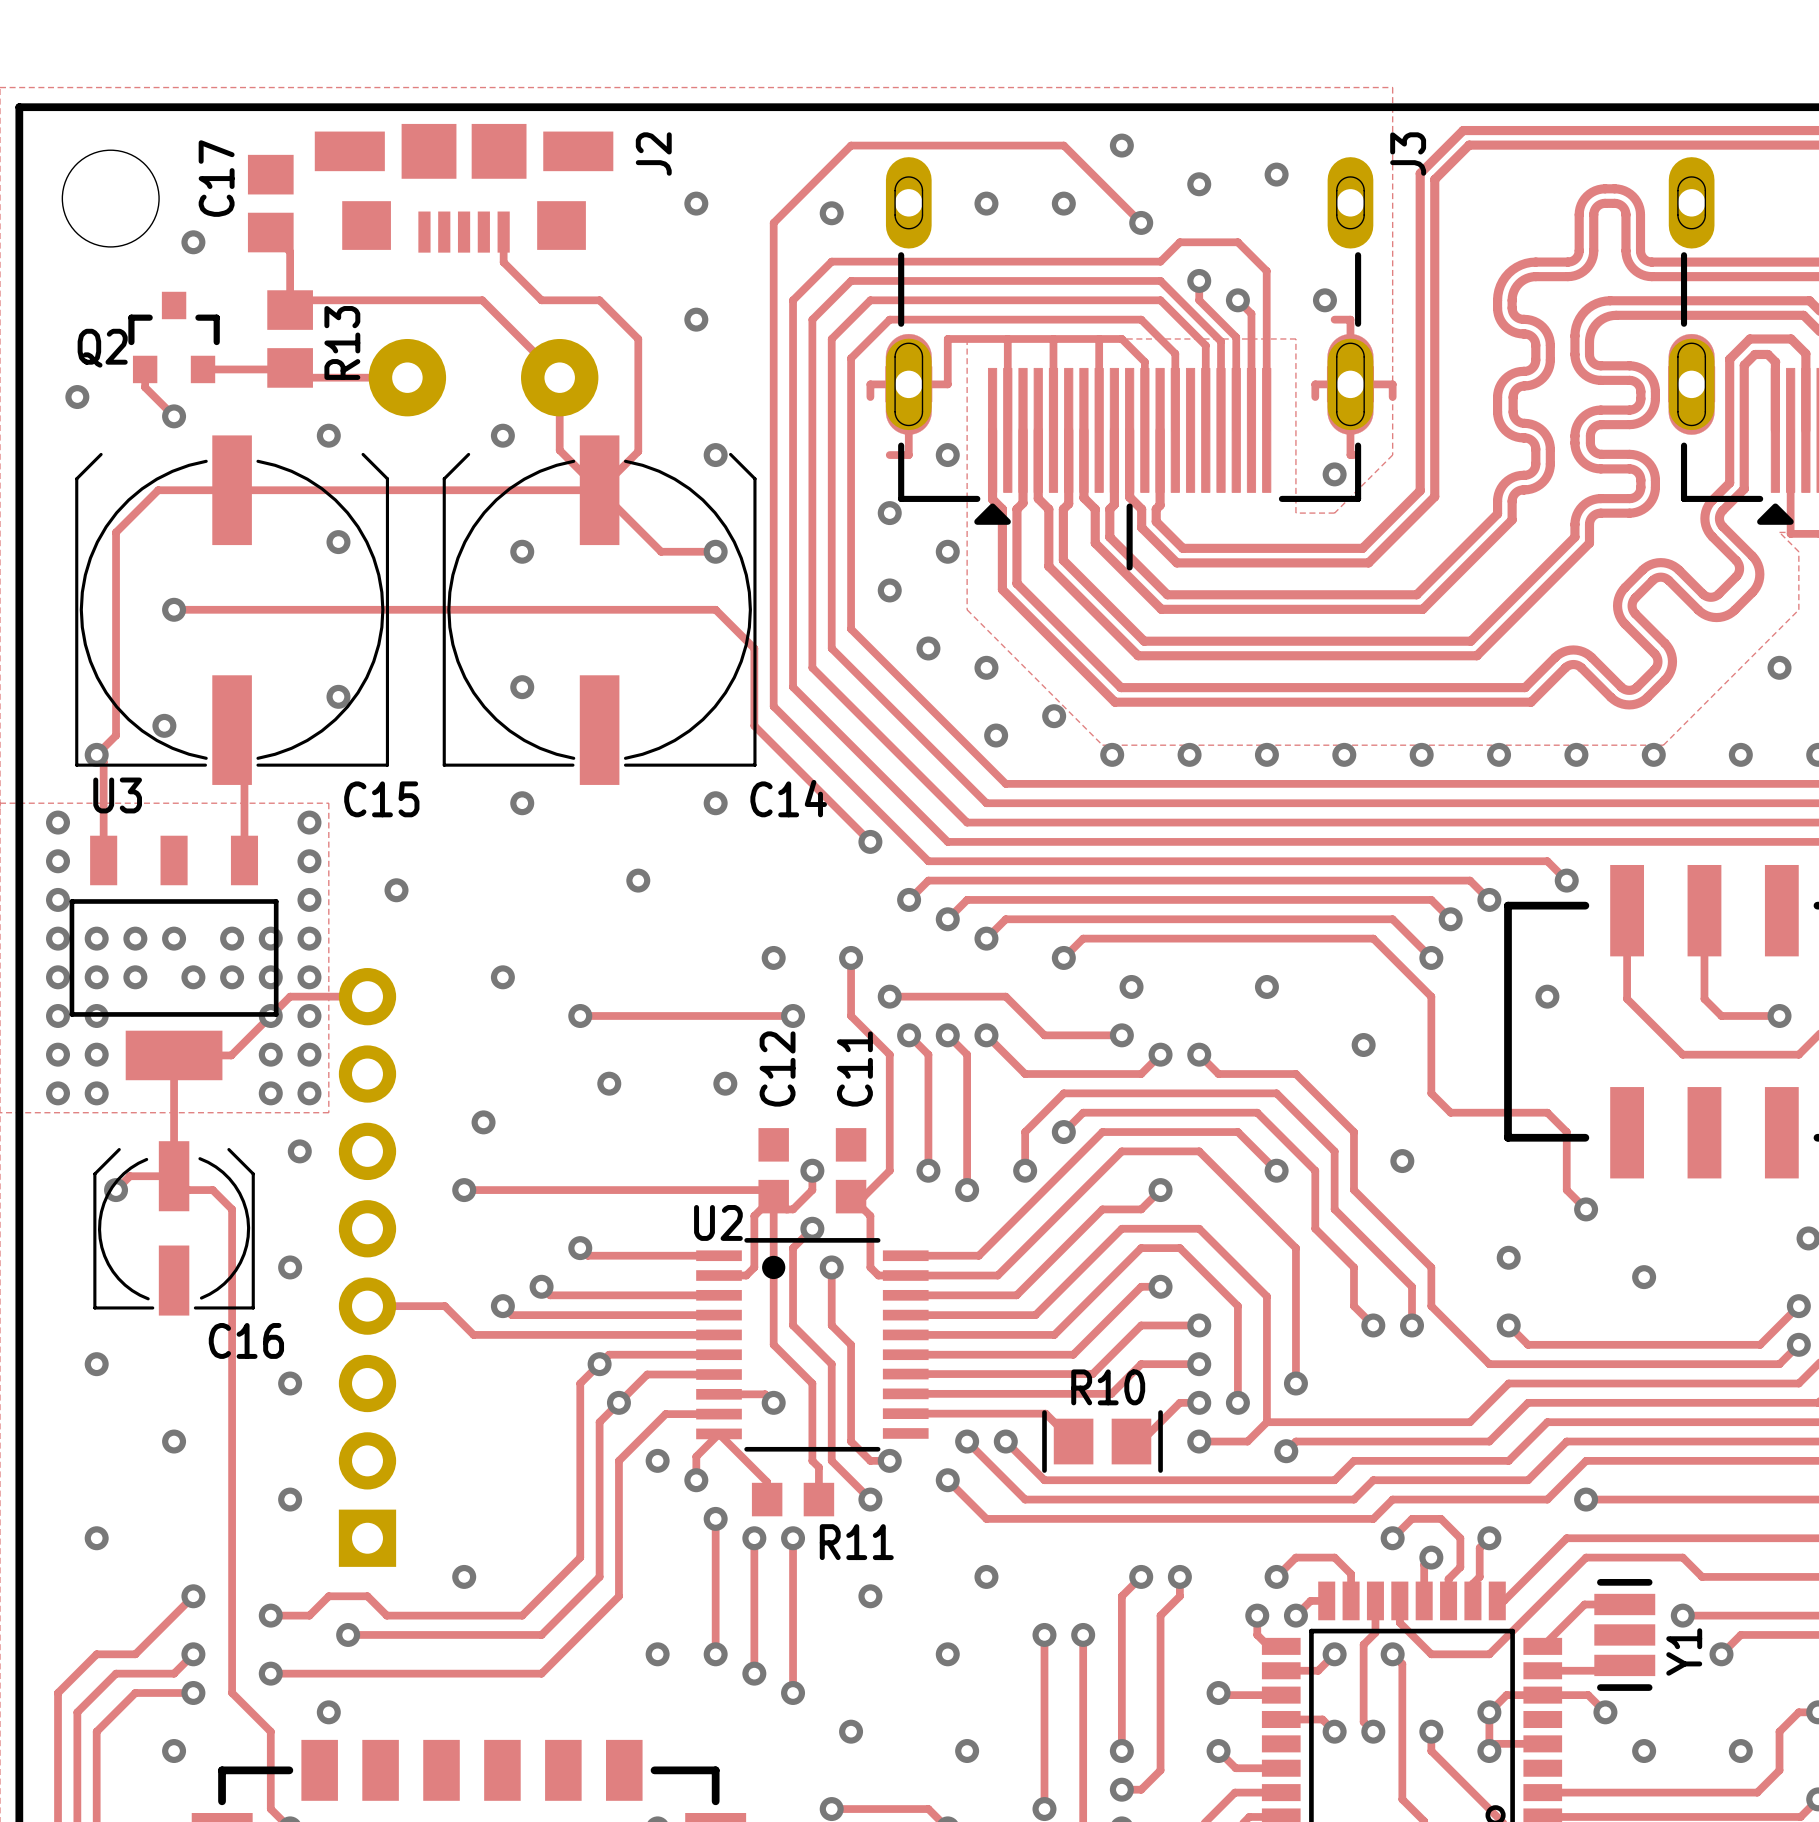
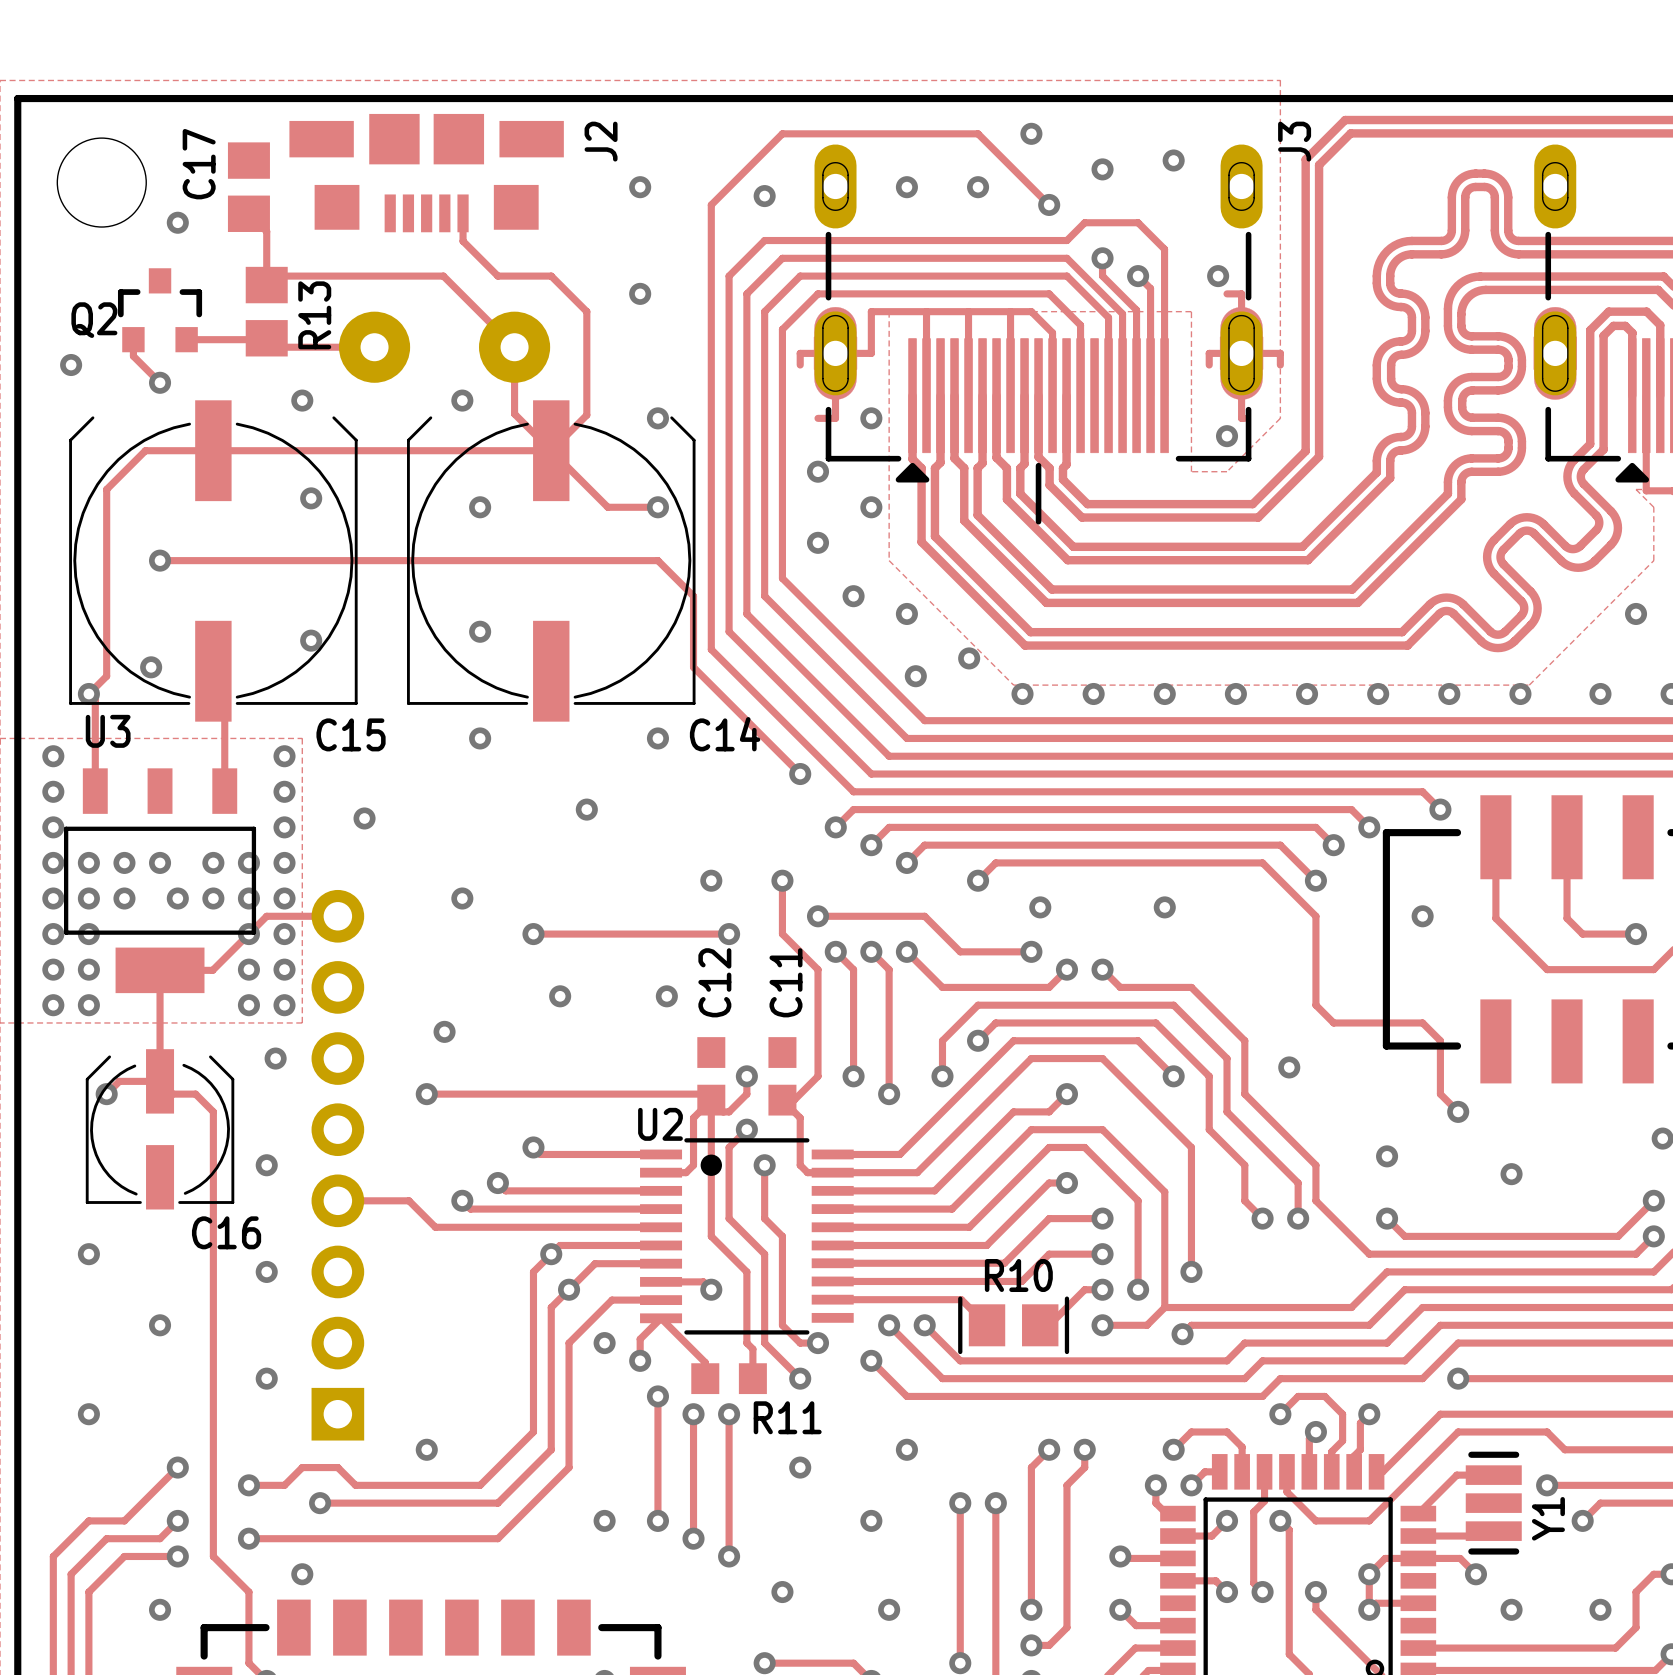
via: (1363, 1045) -> none

